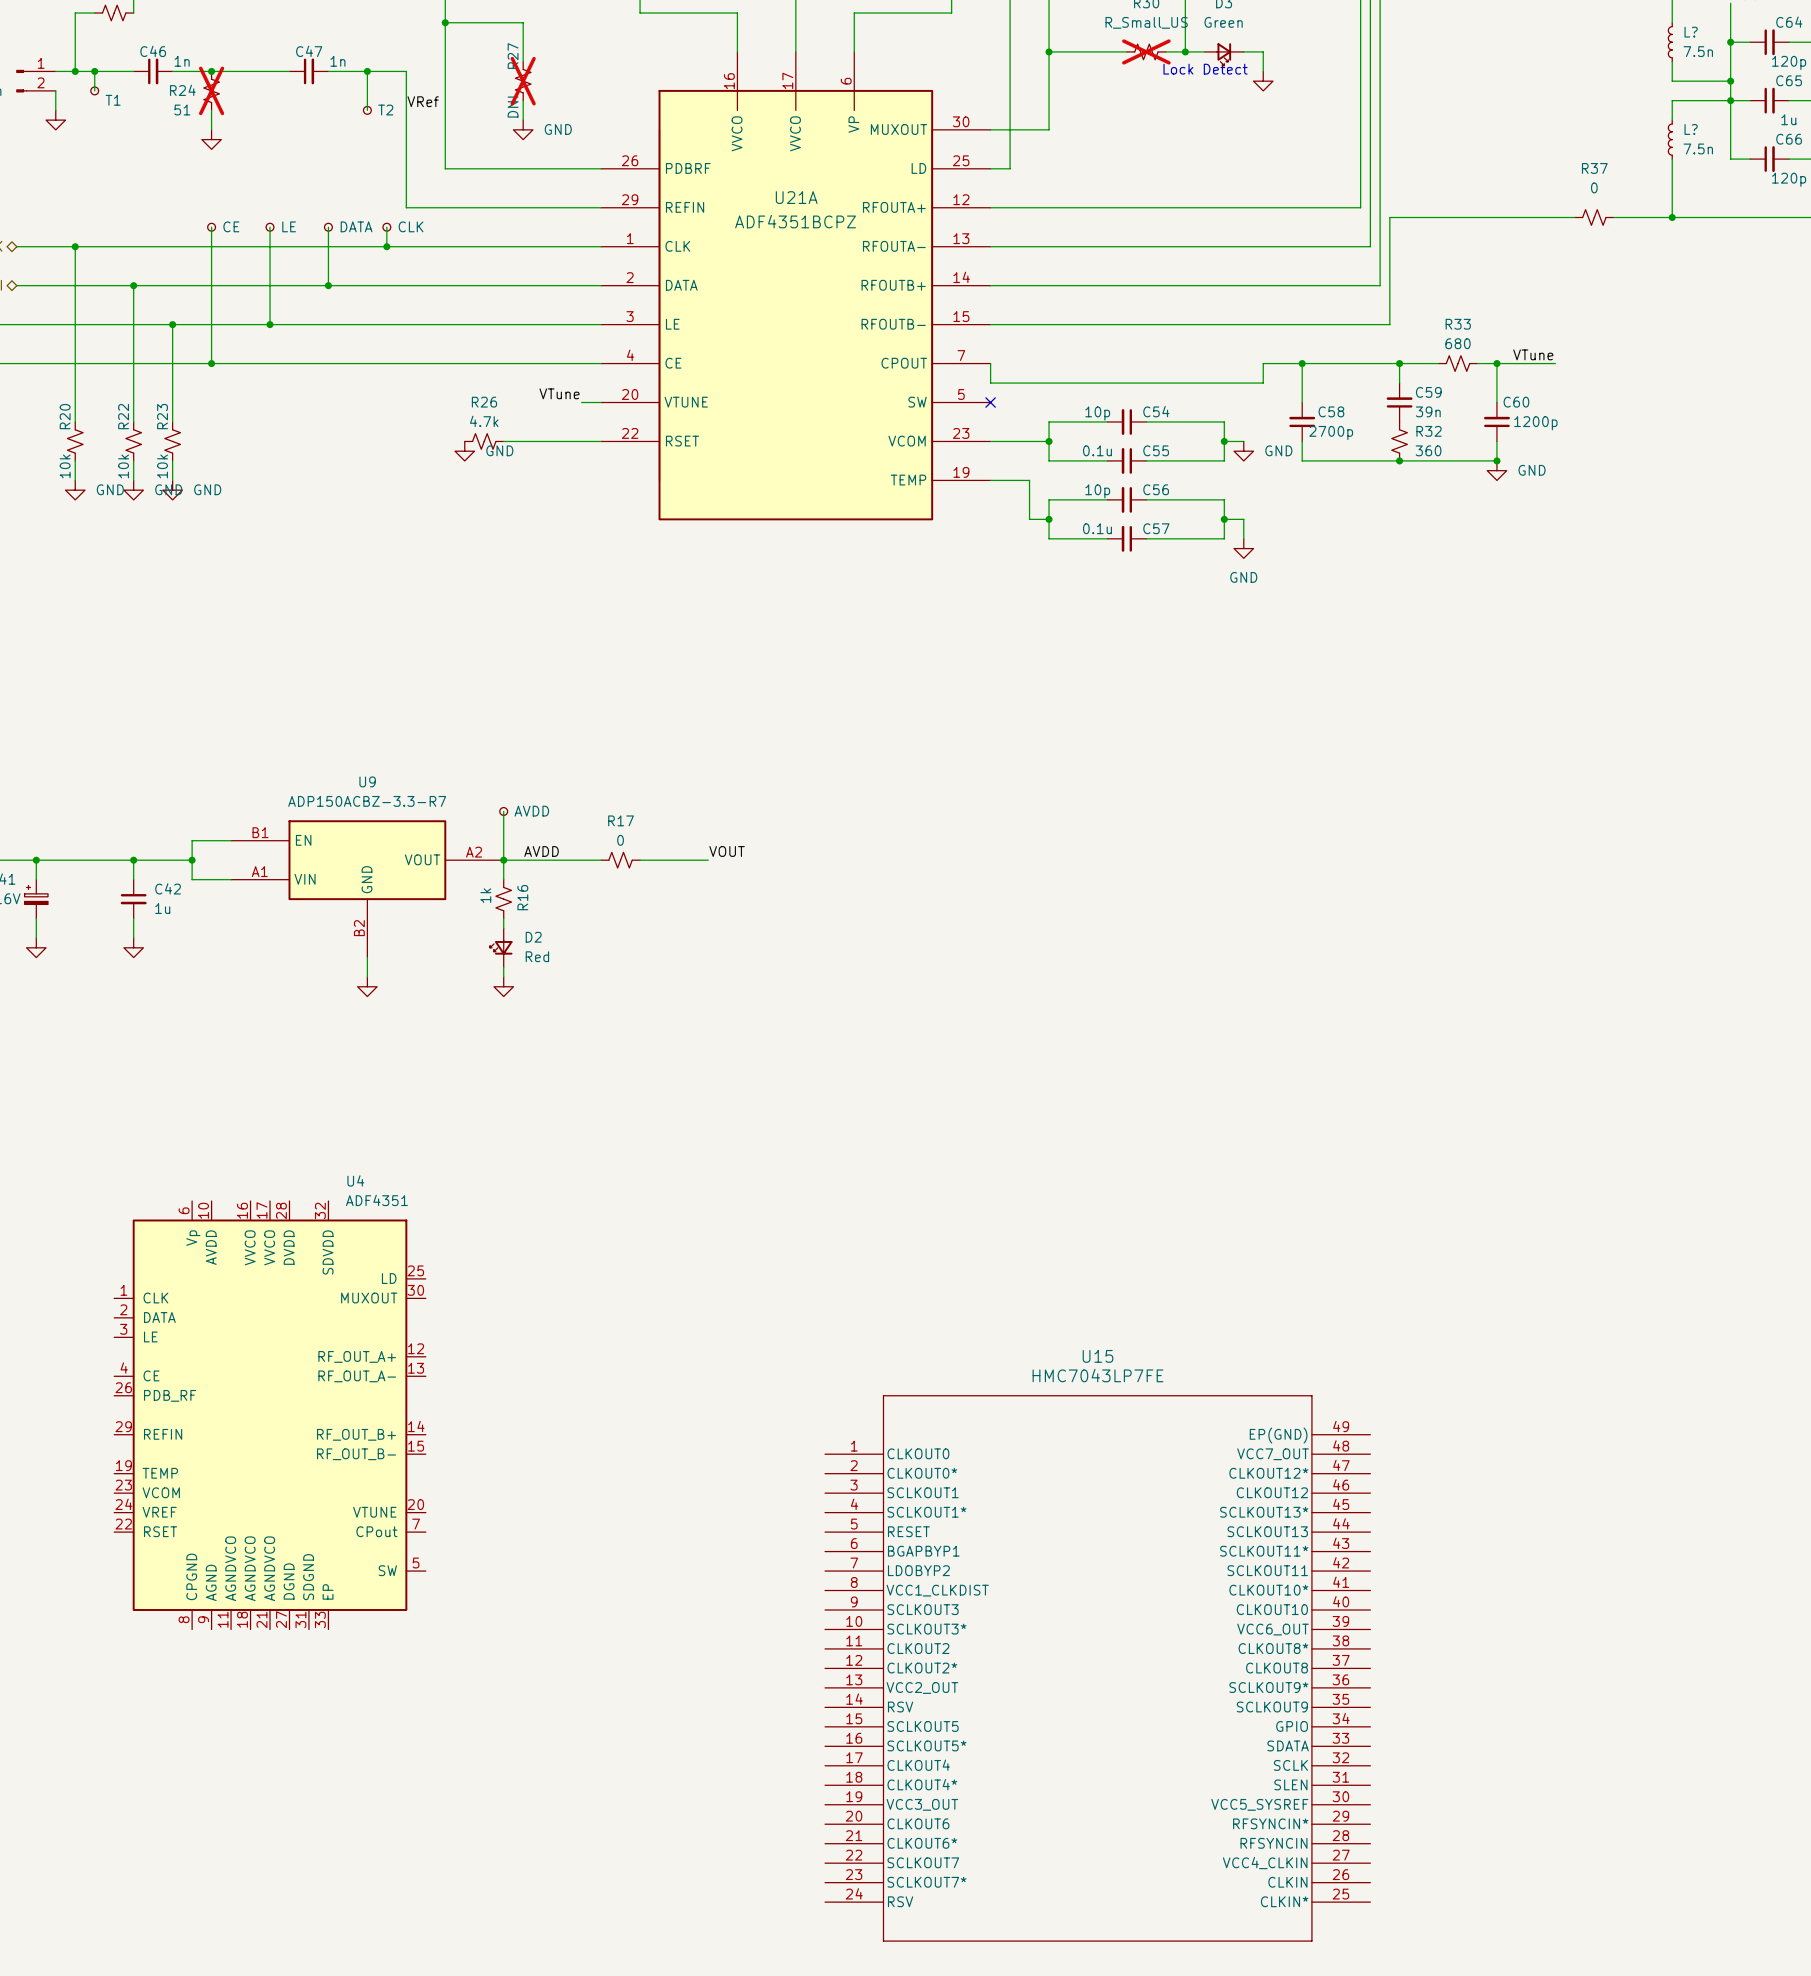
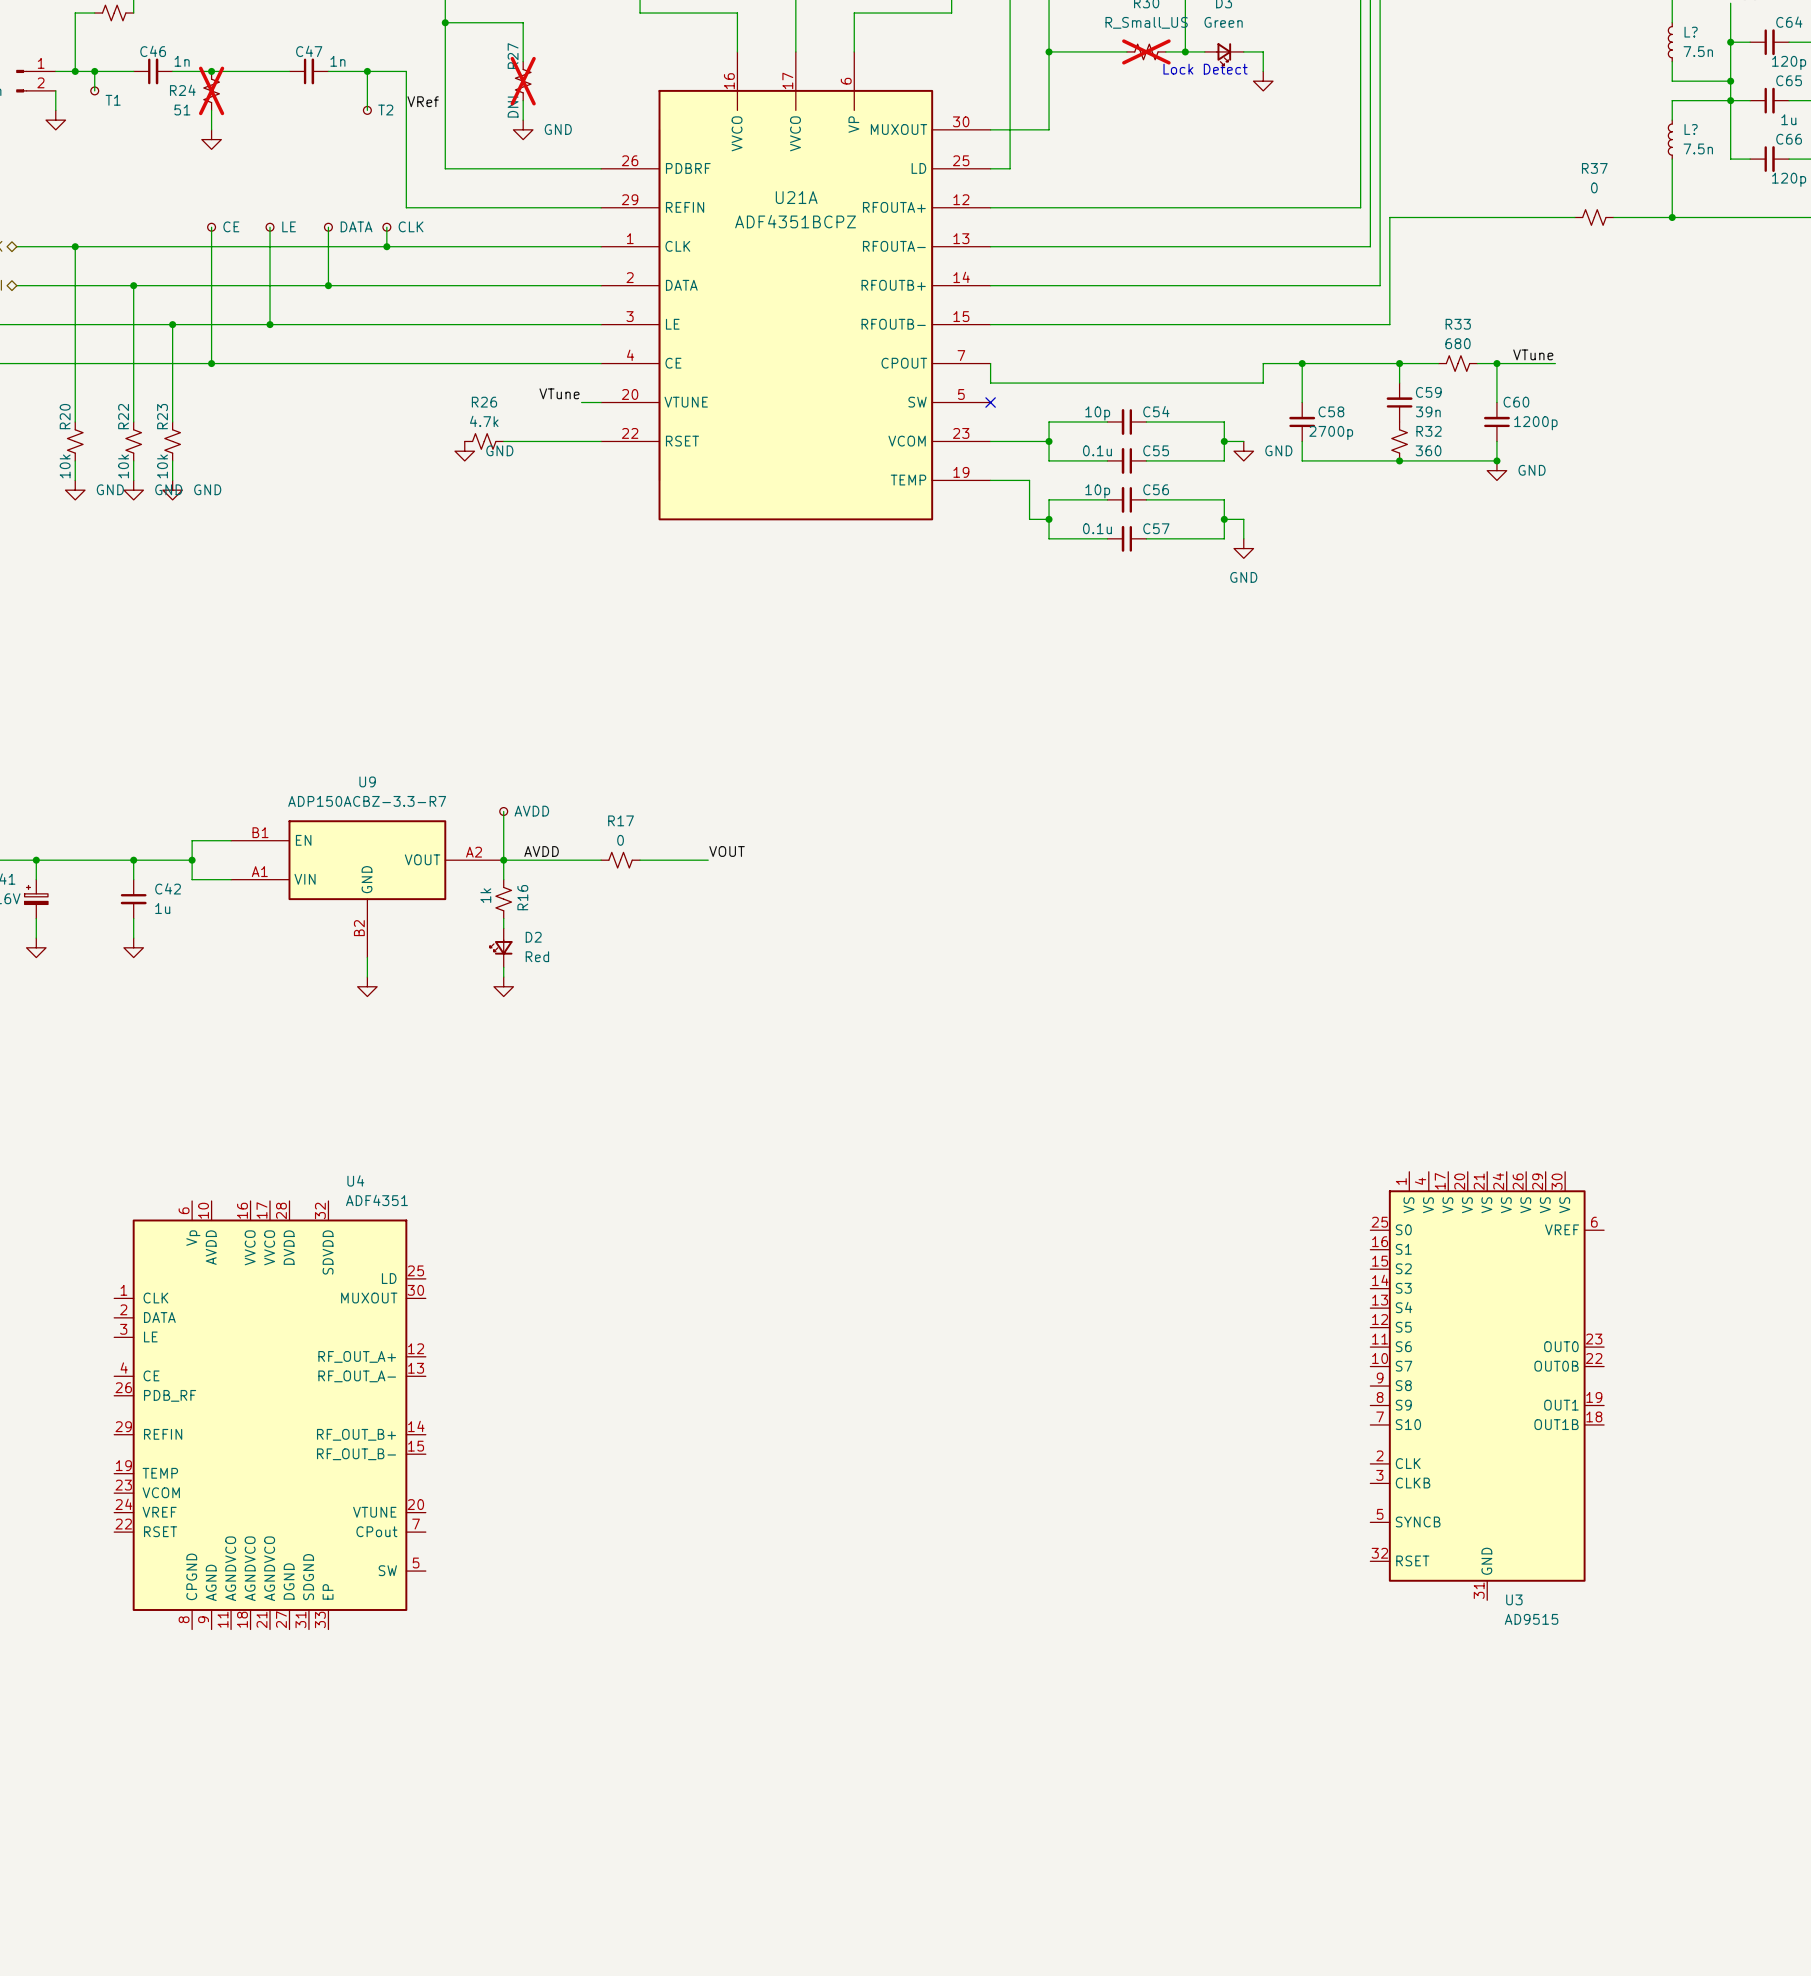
U3: none -> AD9515 (1487, 1386)
U15: HMC7043LP7FE (1097, 1668) -> none

